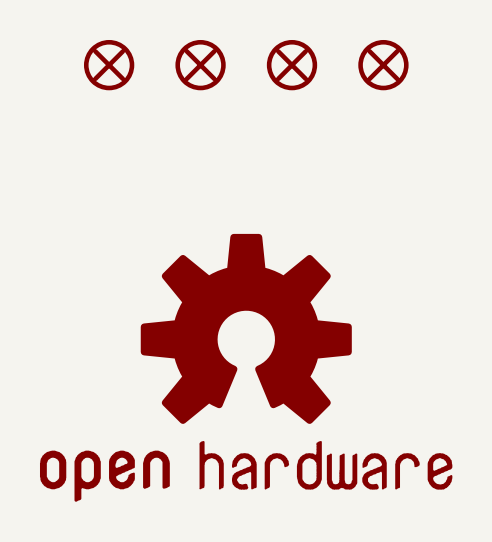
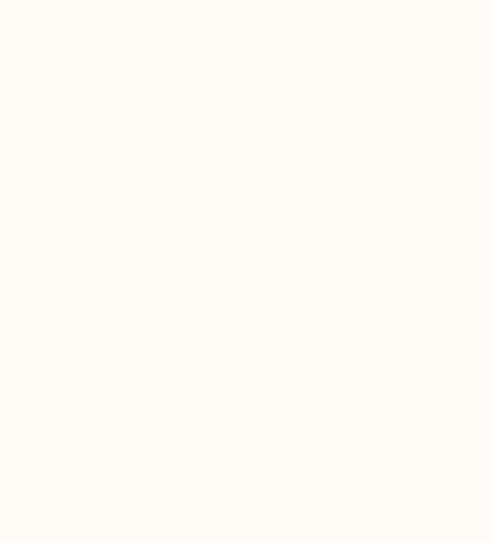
part: (109, 65) -> none
part: (200, 65) -> none
part: (292, 65) -> none
part: (383, 65) -> none
part: (246, 367) -> none

